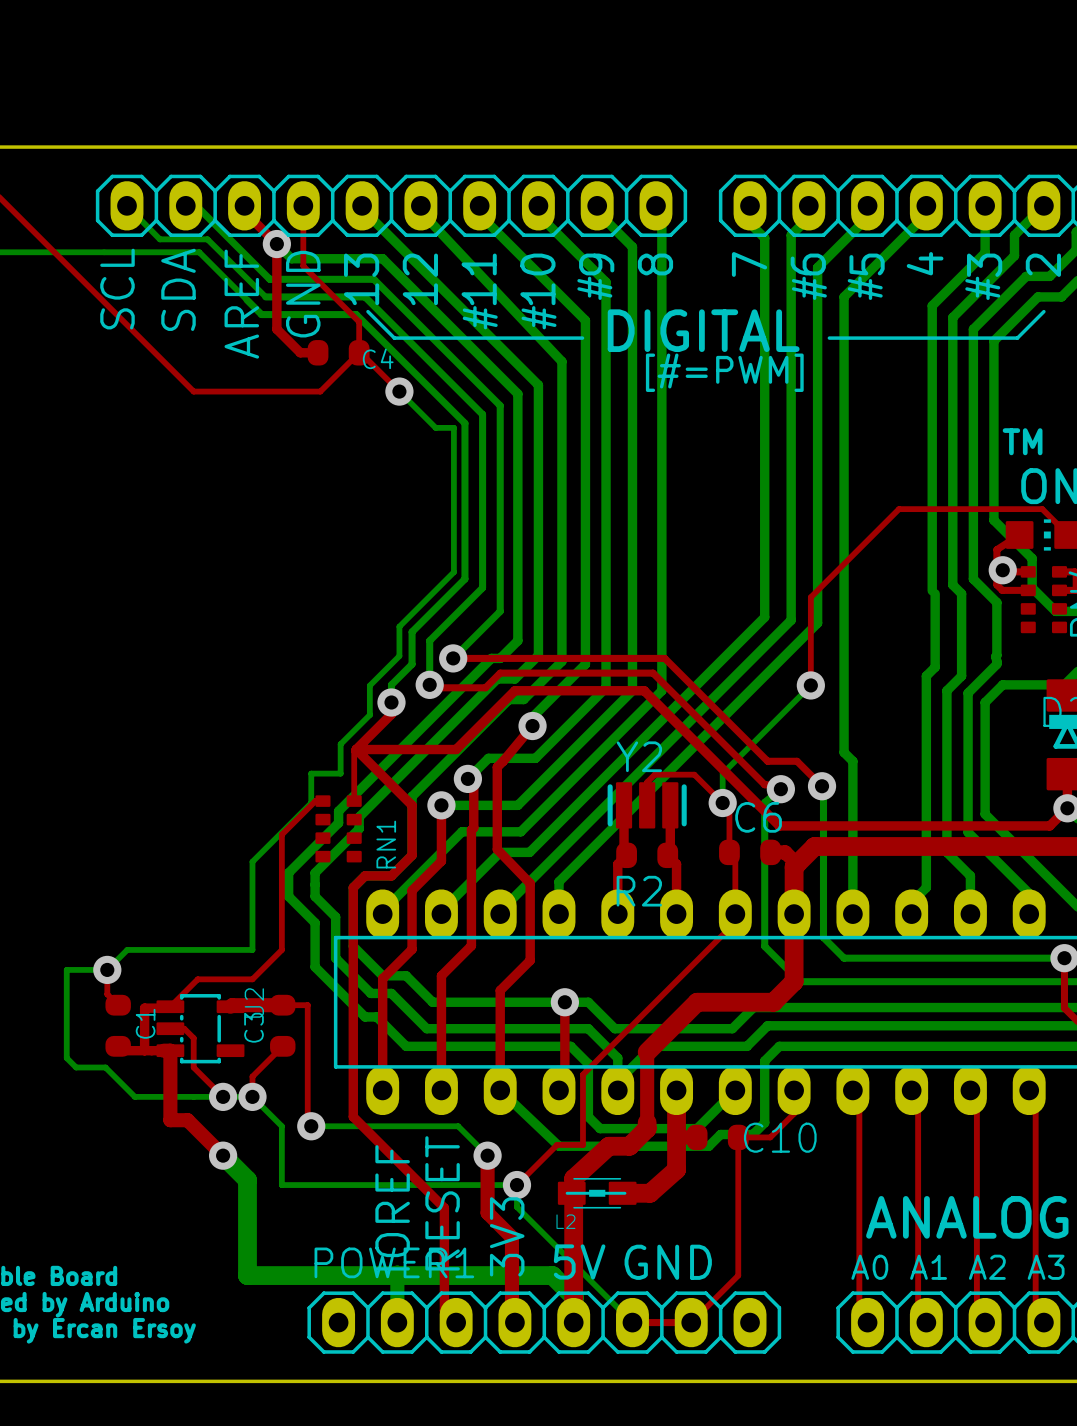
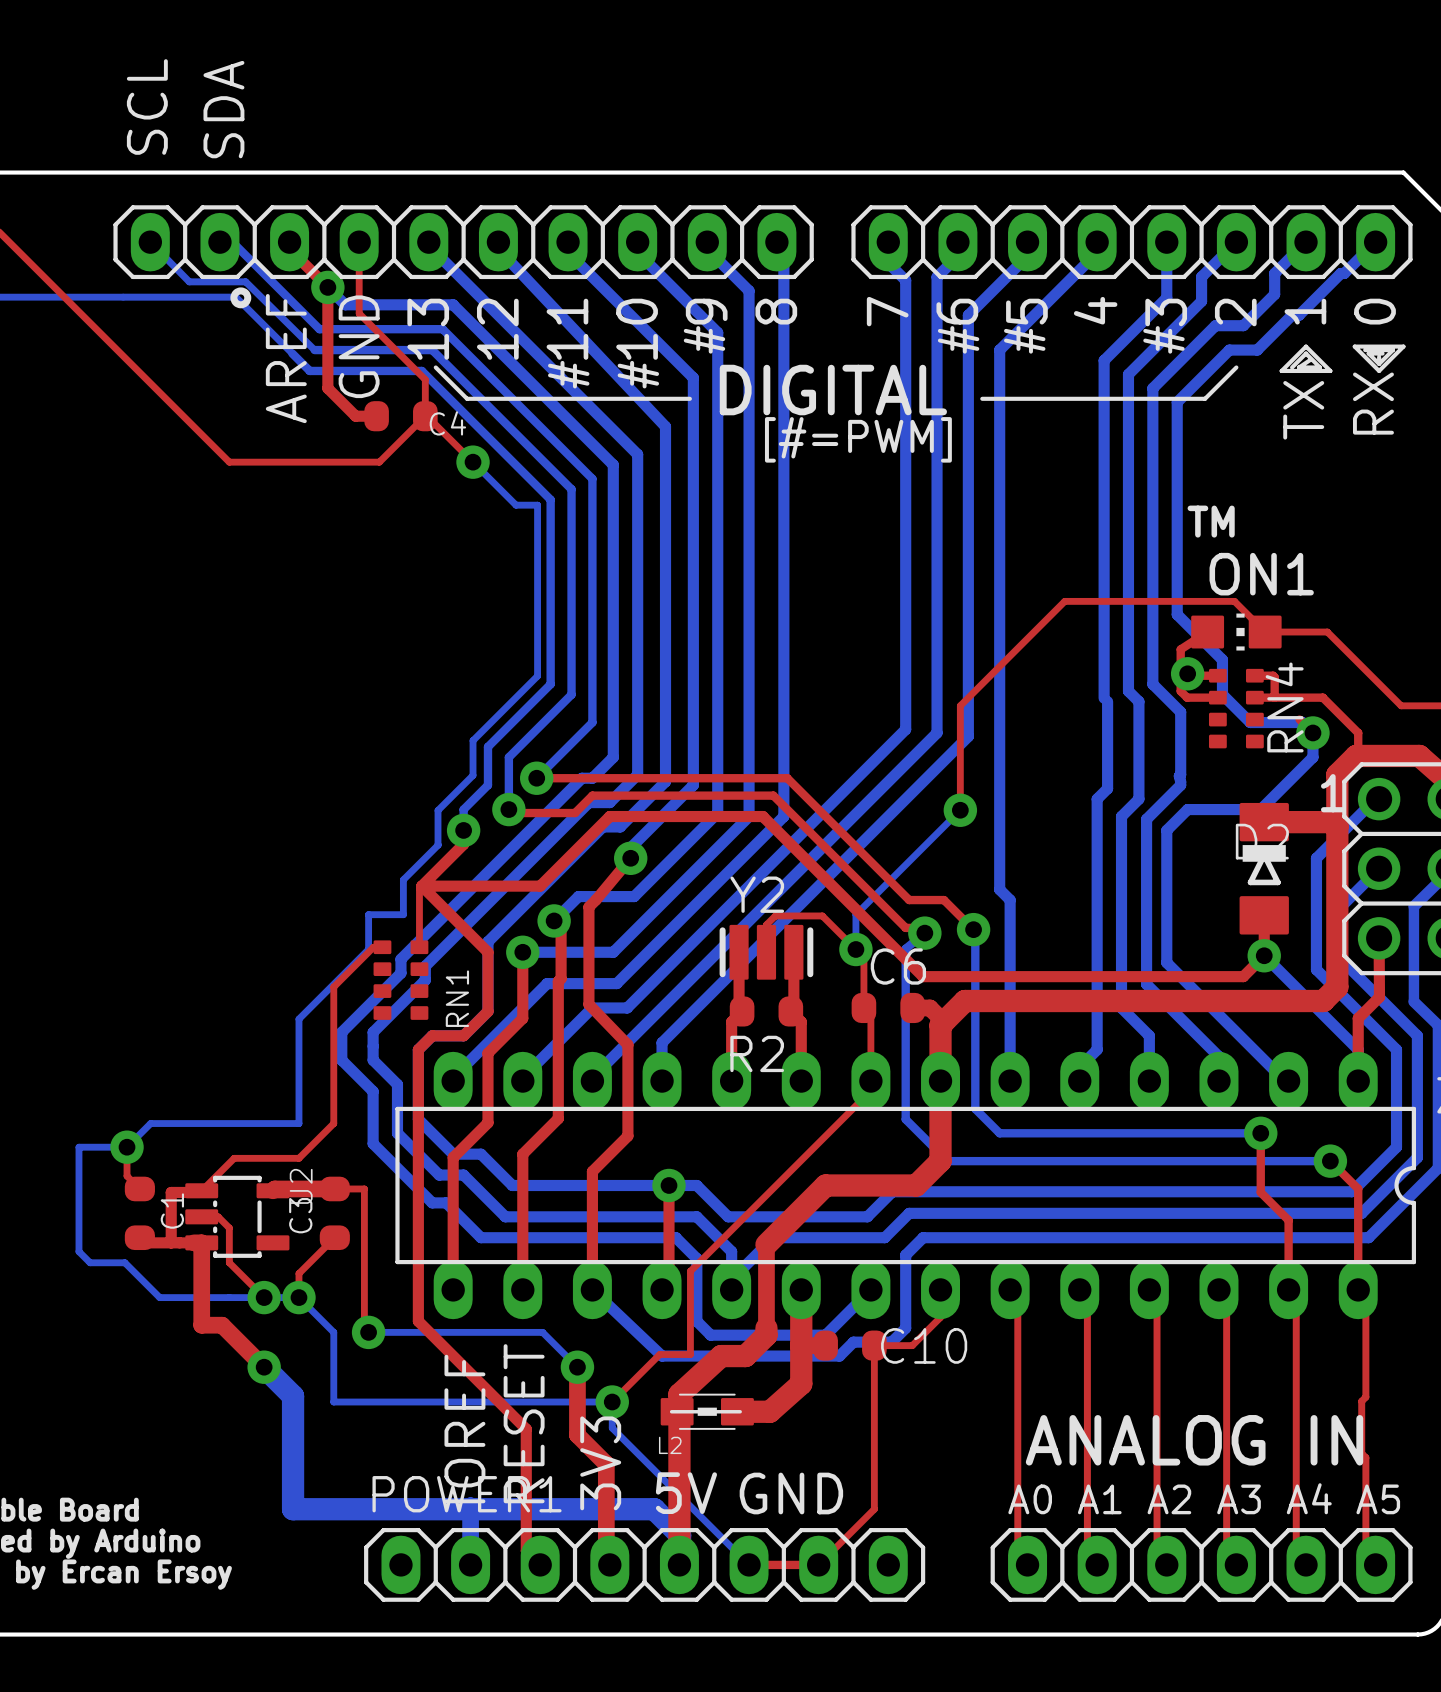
drawing: none -> [230, 287, 252, 309]
text position: SCL (117, 289) -> SCL (147, 106)
text position: SDA (178, 289) -> SDA (223, 109)

